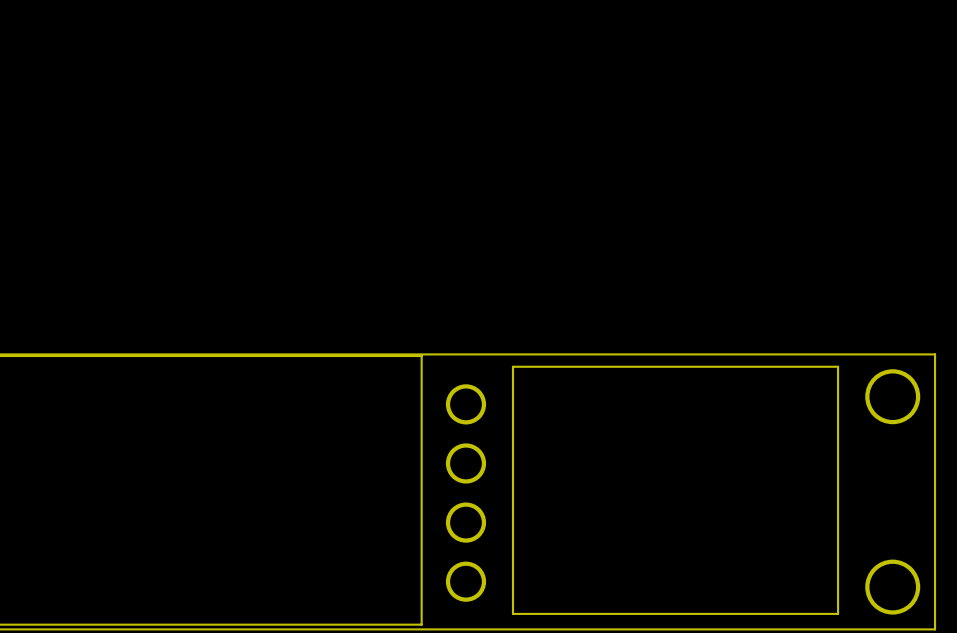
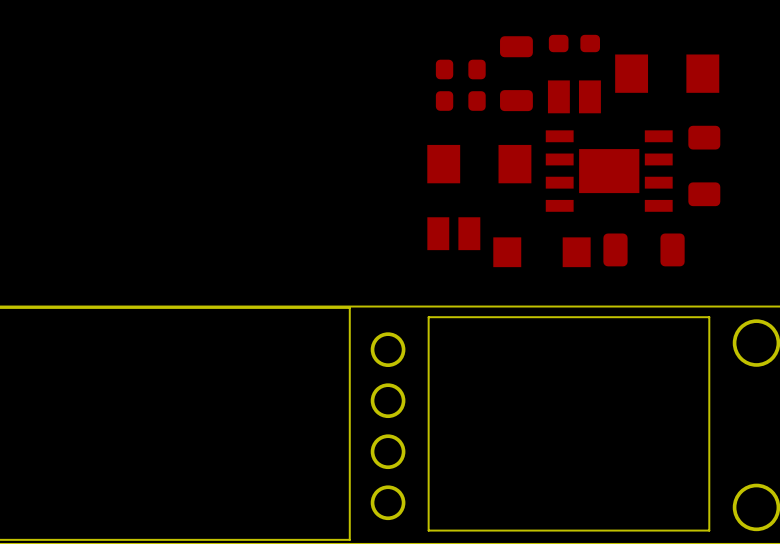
part: none -> (574, 43)
part: none -> (516, 73)
part: none -> (667, 73)
part: none -> (444, 85)
part: none -> (477, 85)
part: none -> (574, 96)
part: none -> (479, 164)
part: none -> (704, 165)
part: none -> (609, 171)
part: none -> (453, 233)
part: none -> (644, 249)
part: none -> (541, 252)

